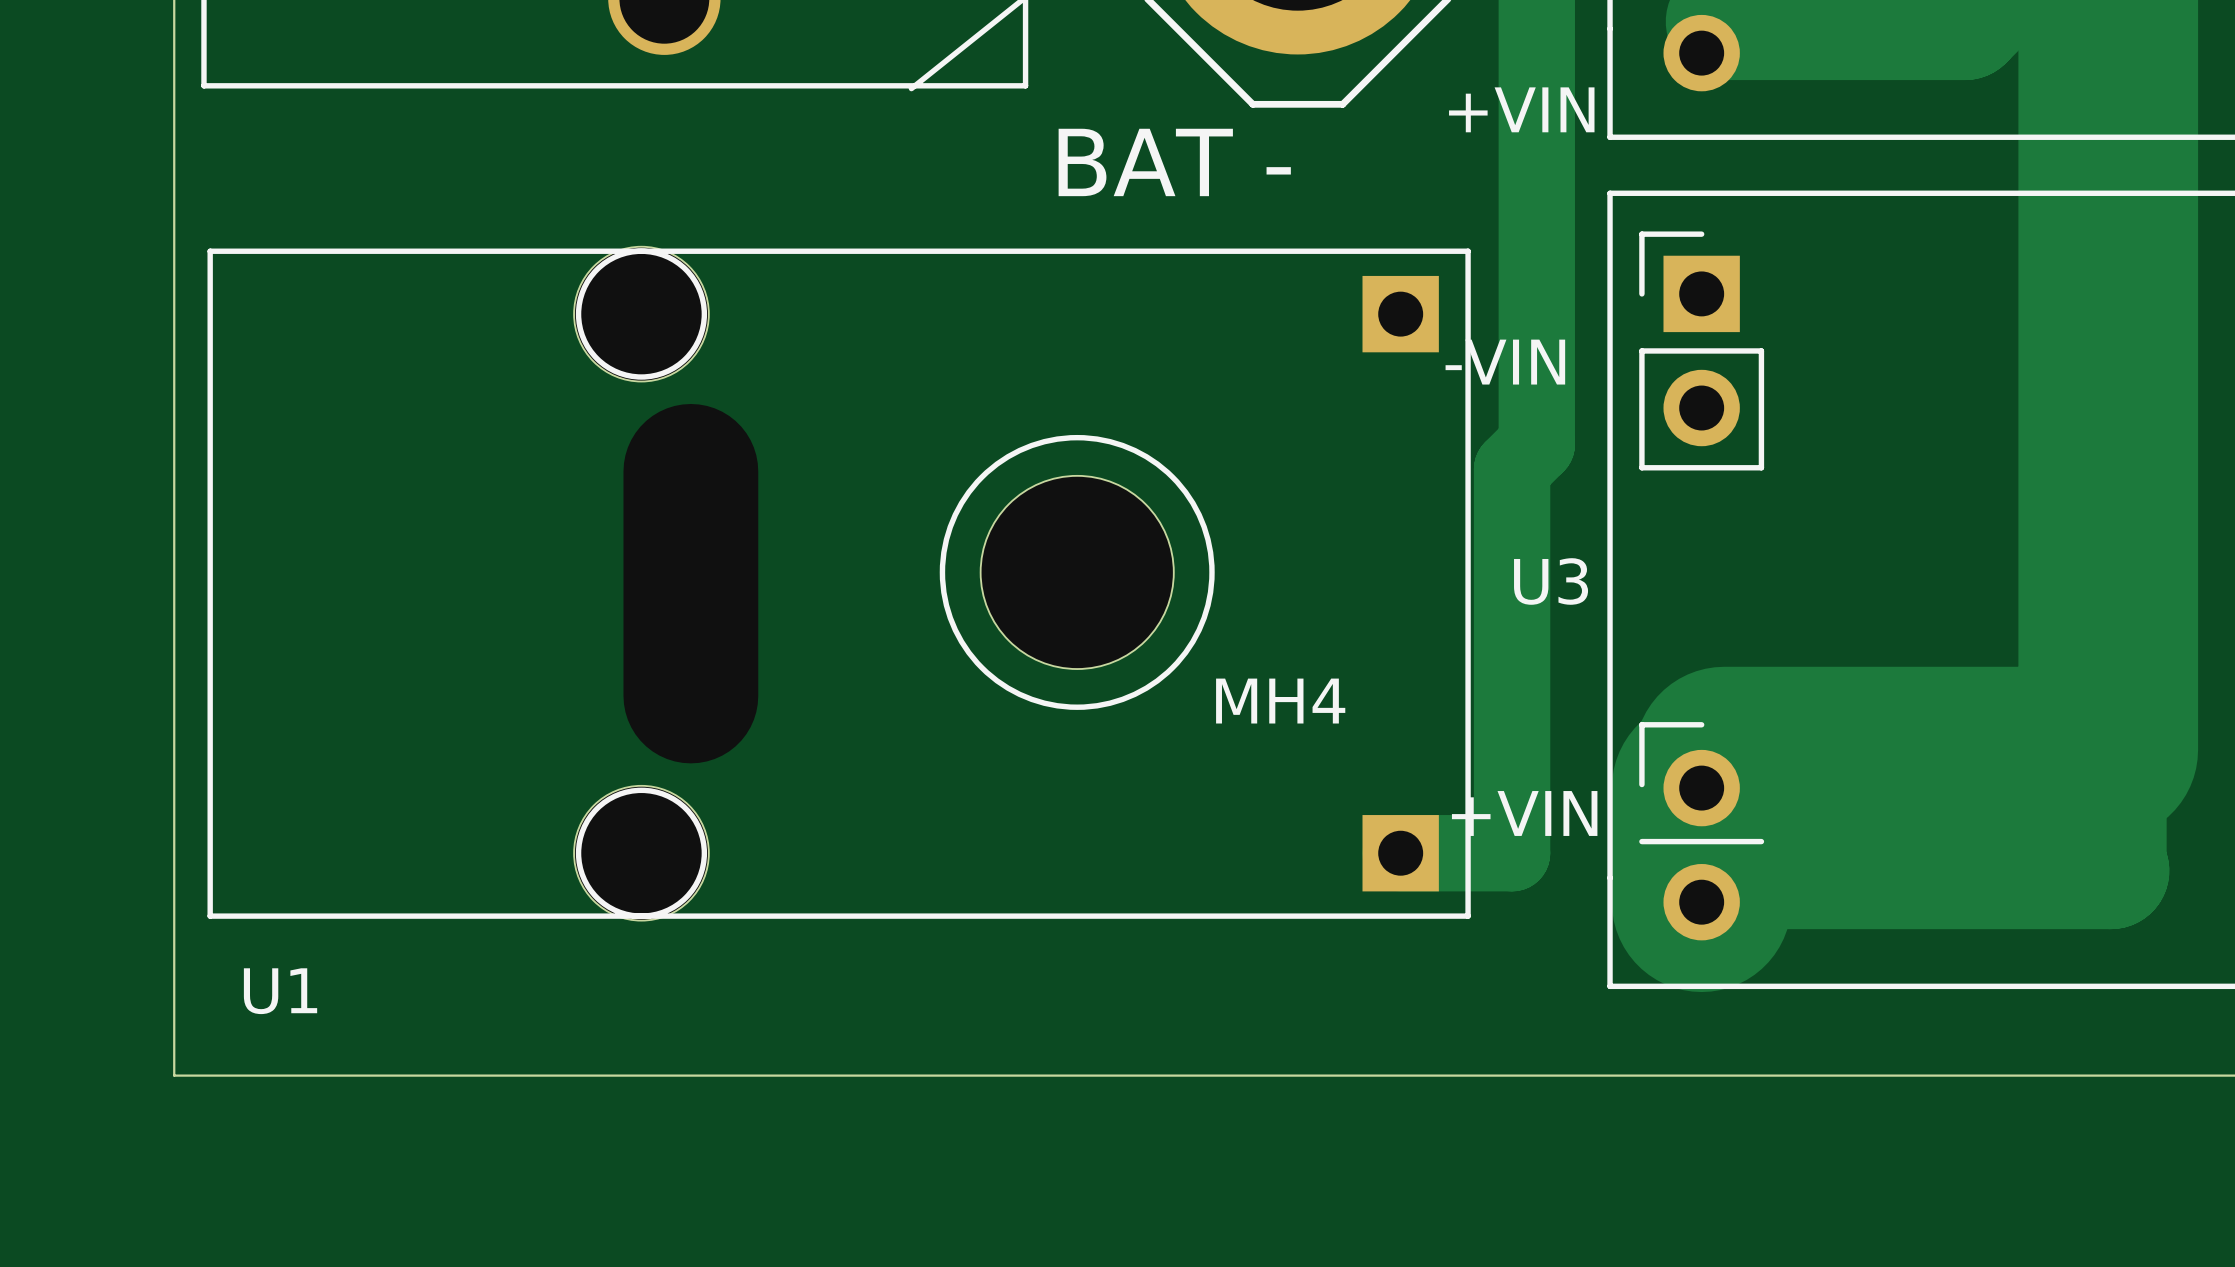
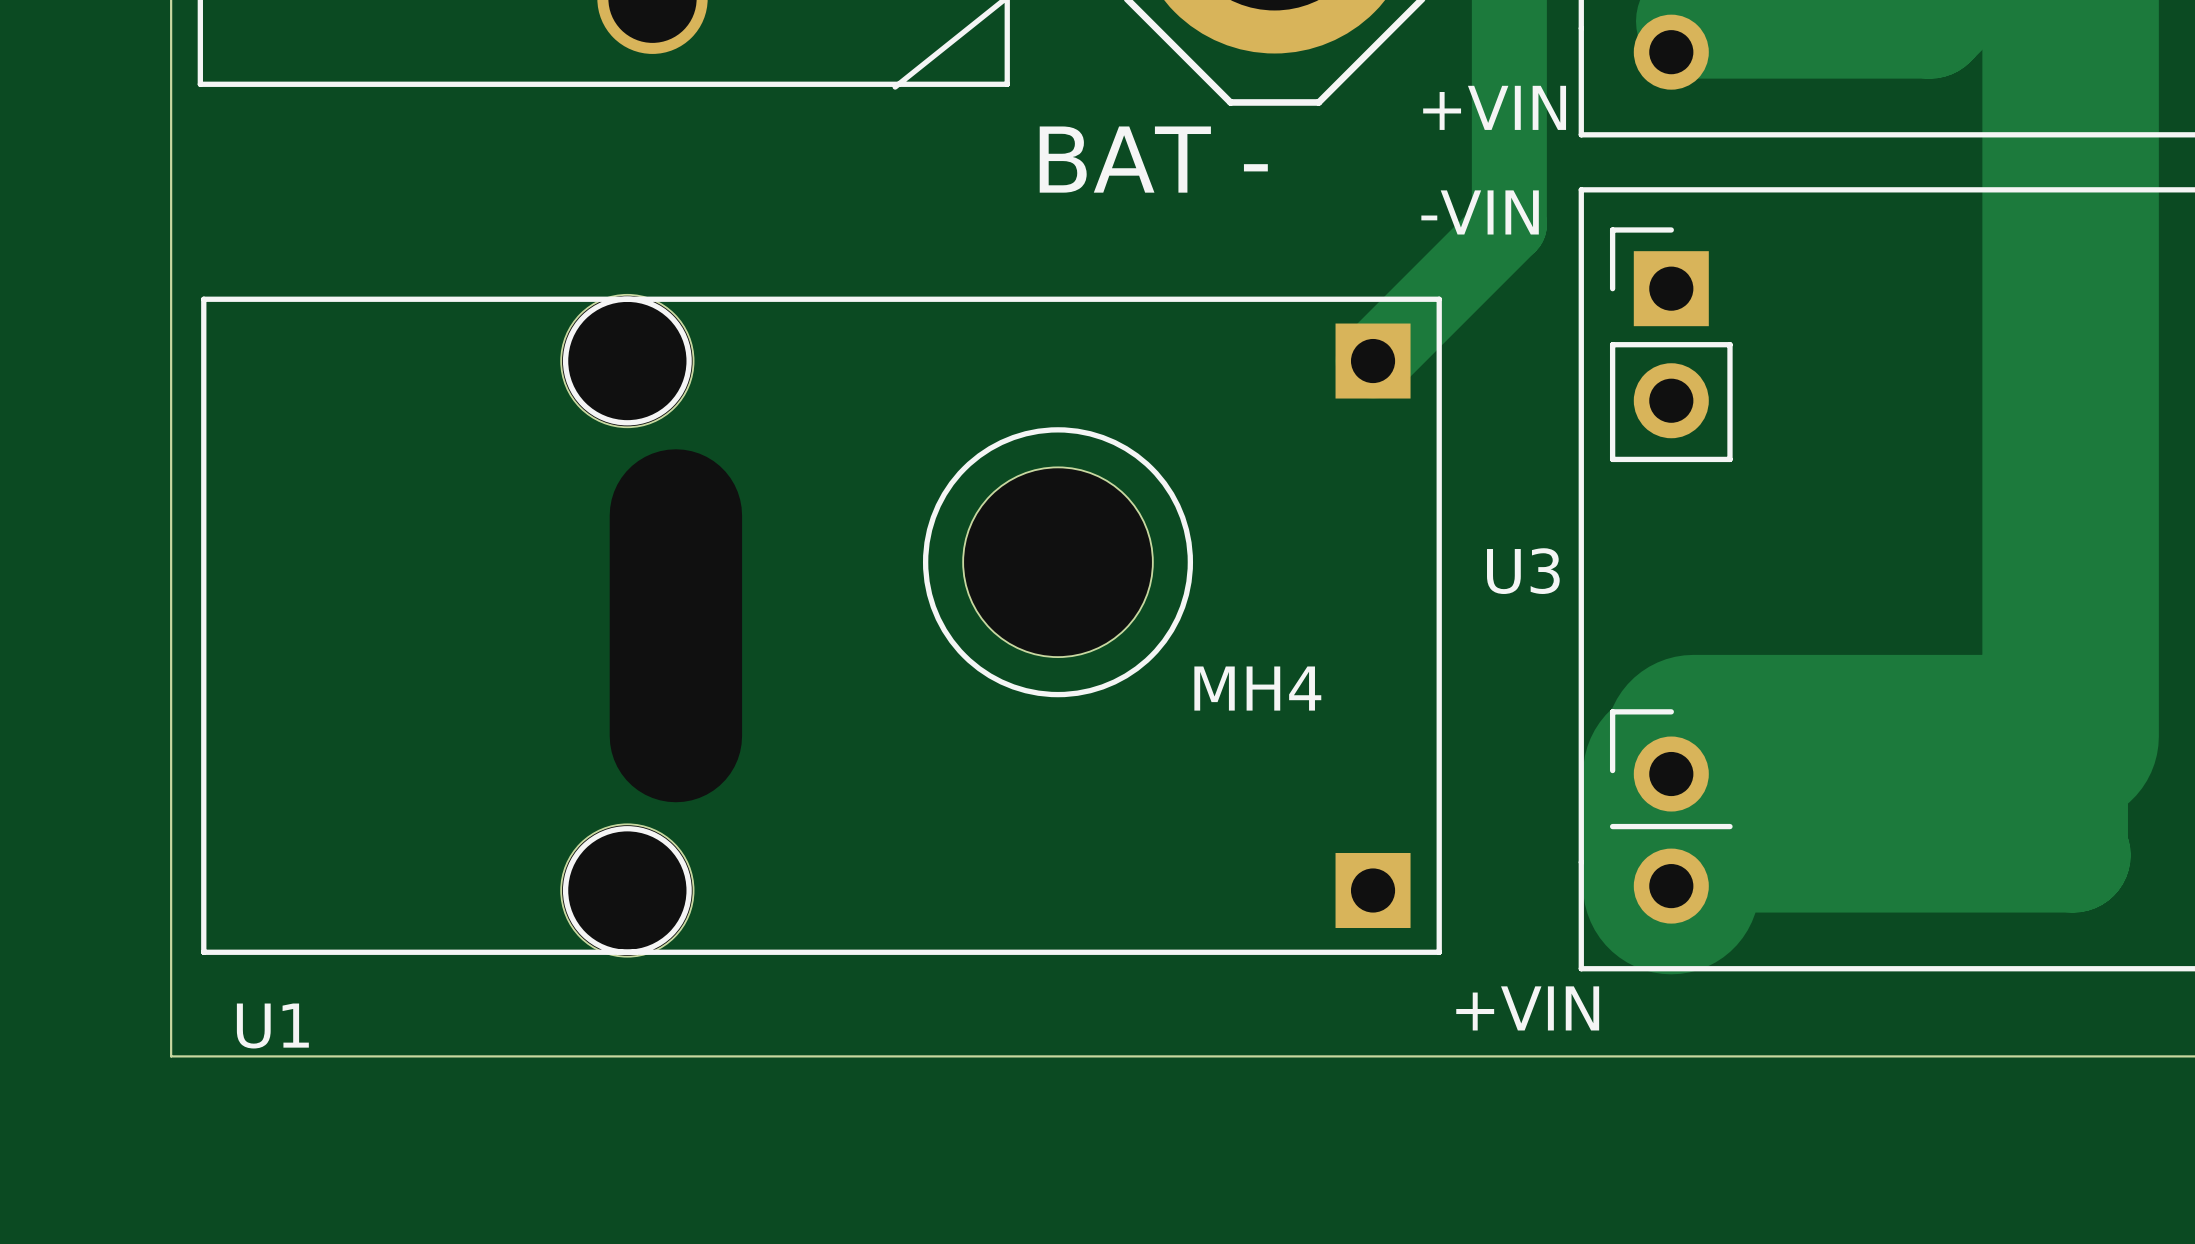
track: (1536, 228) (1536, 444) (1512, 469) (1512, 853) (1400, 853) -> (1509, 224) (1373, 361)
U3 text position: -VIN (1505, 362) -> -VIN (1480, 212)
U1 position: (839, 583) -> (821, 625)
U3 text position: +VIN (1524, 813) -> +VIN (1527, 1008)

